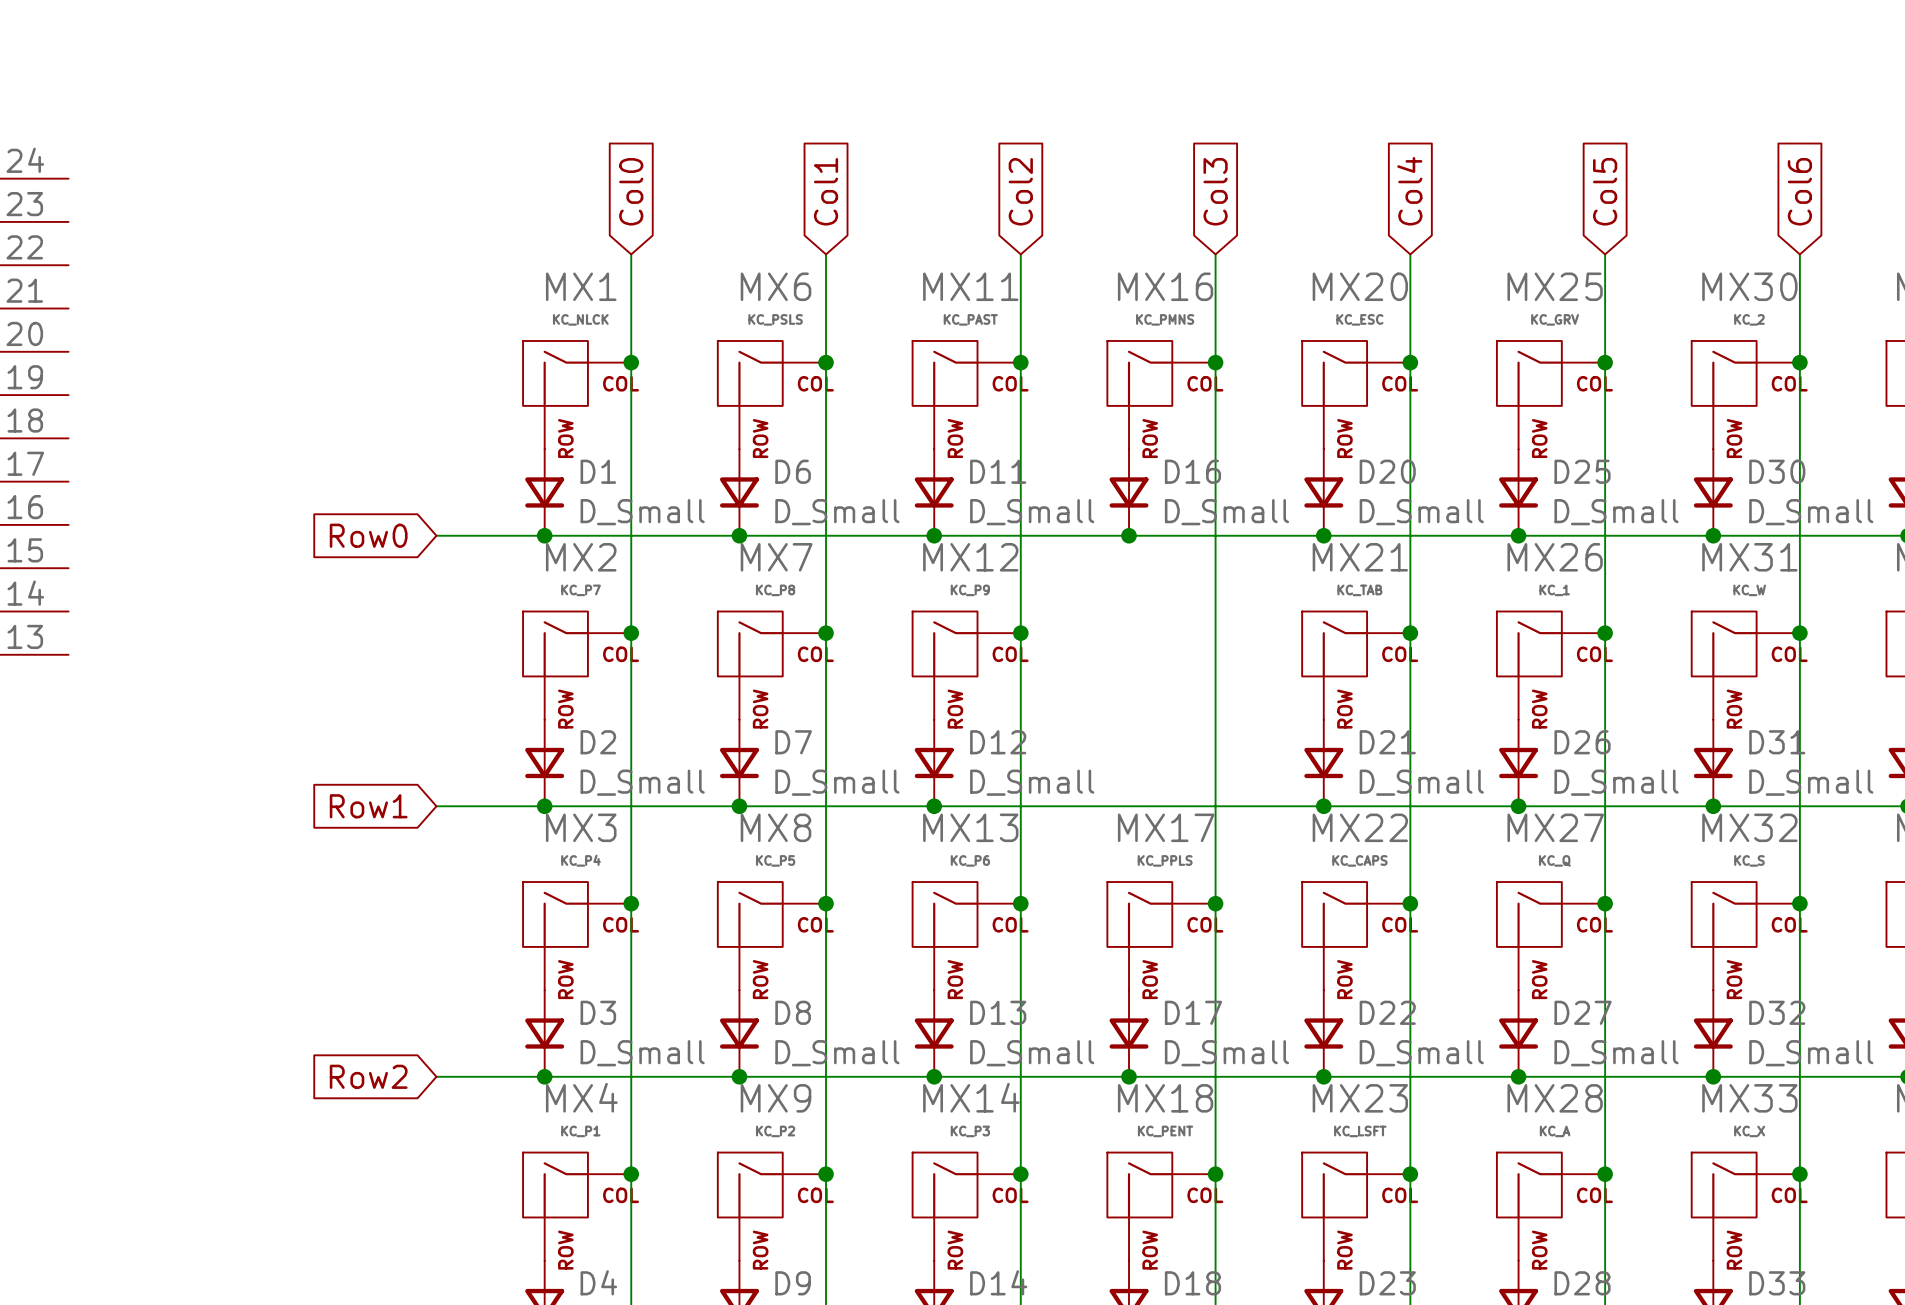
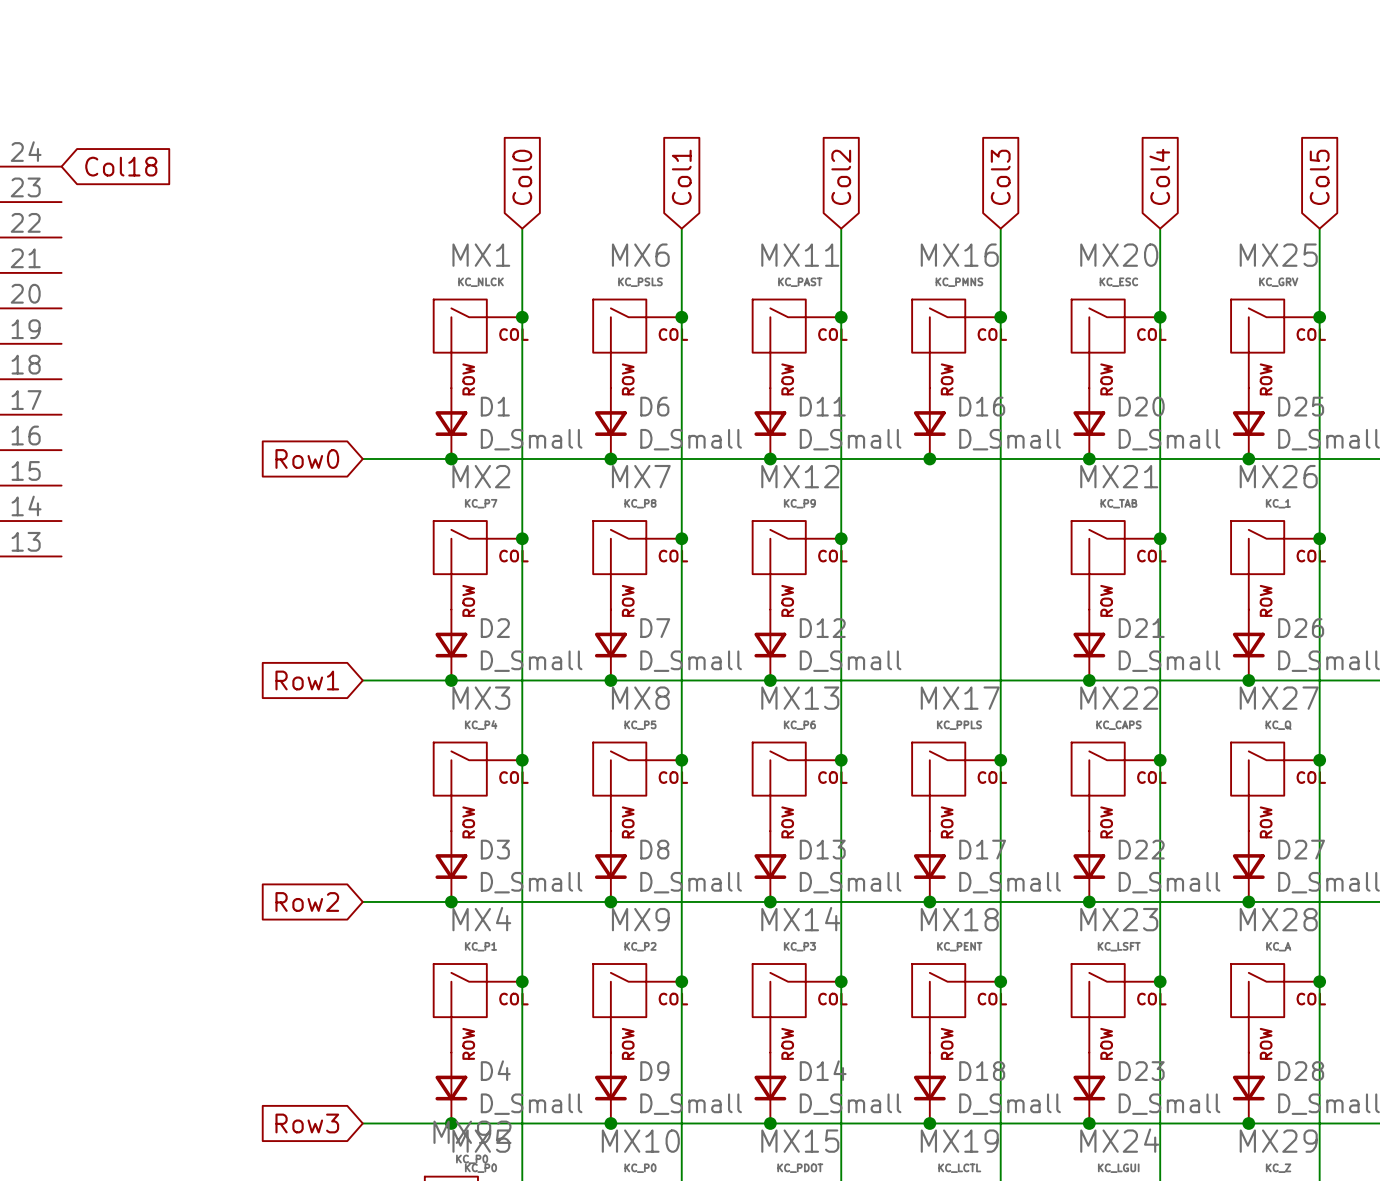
global label: none -> Col18 (121, 166)

